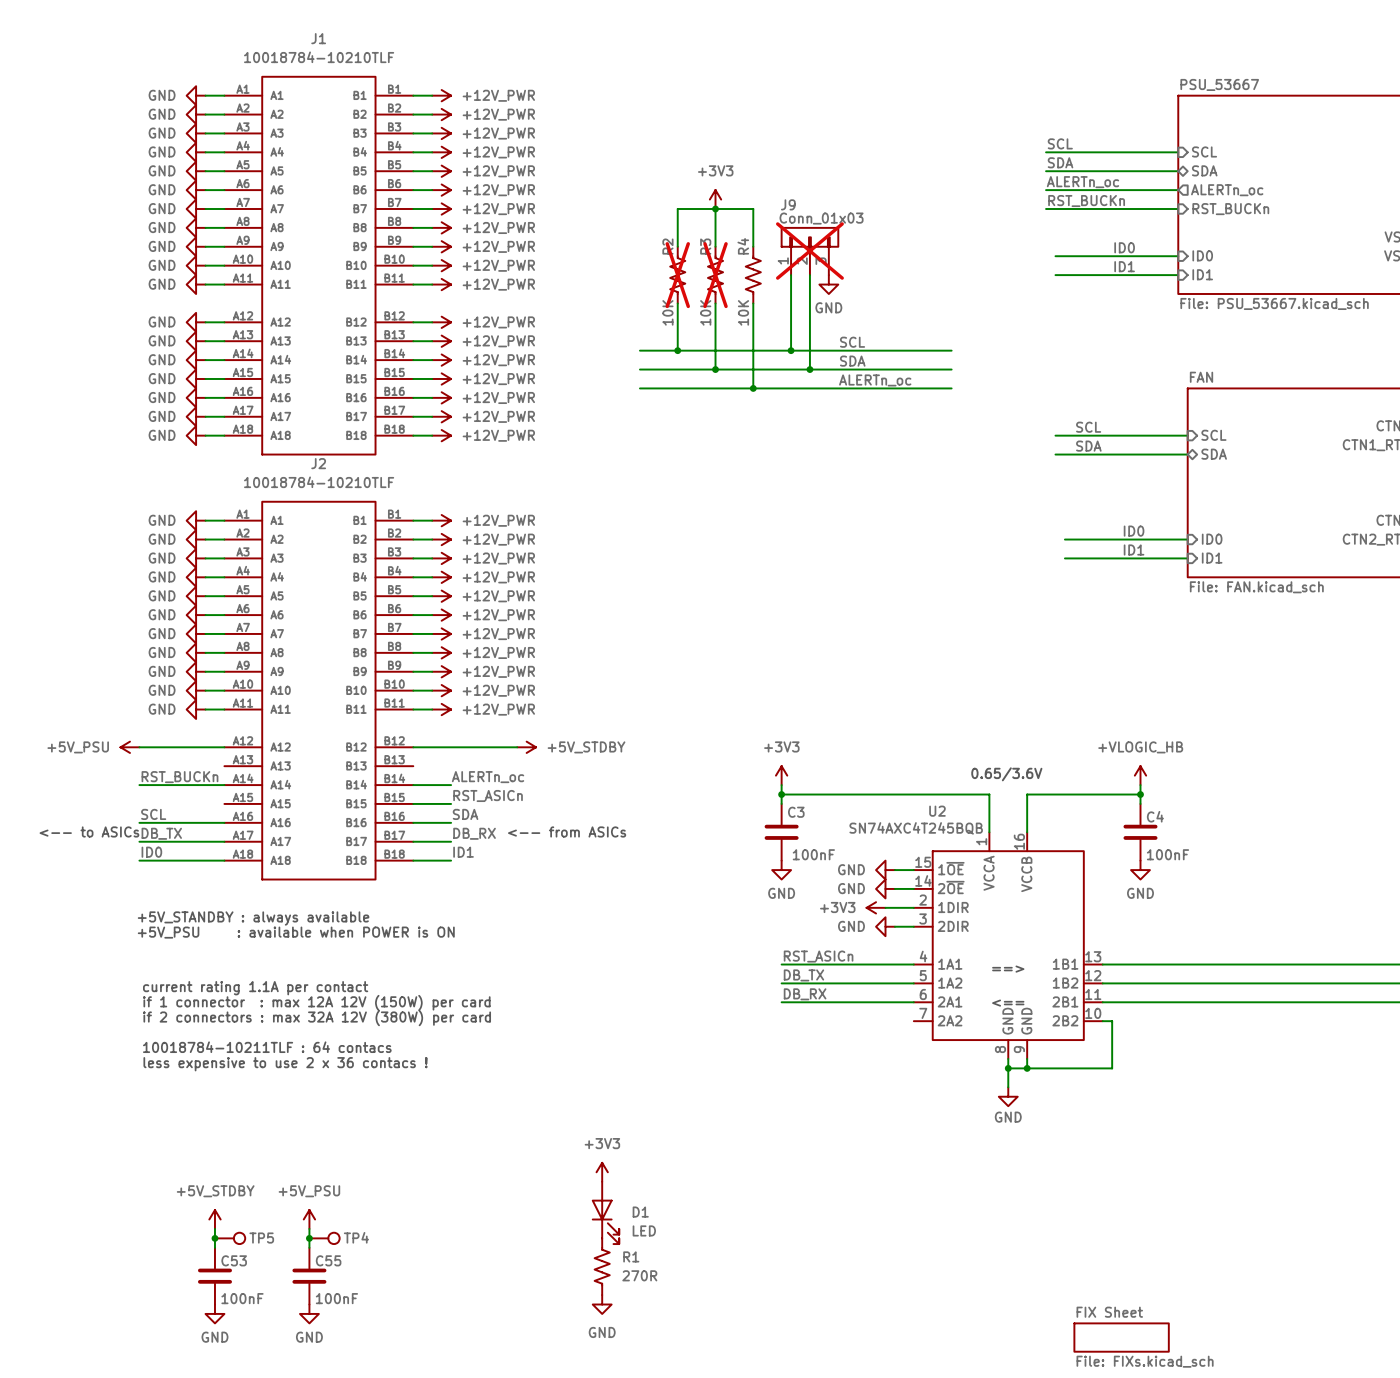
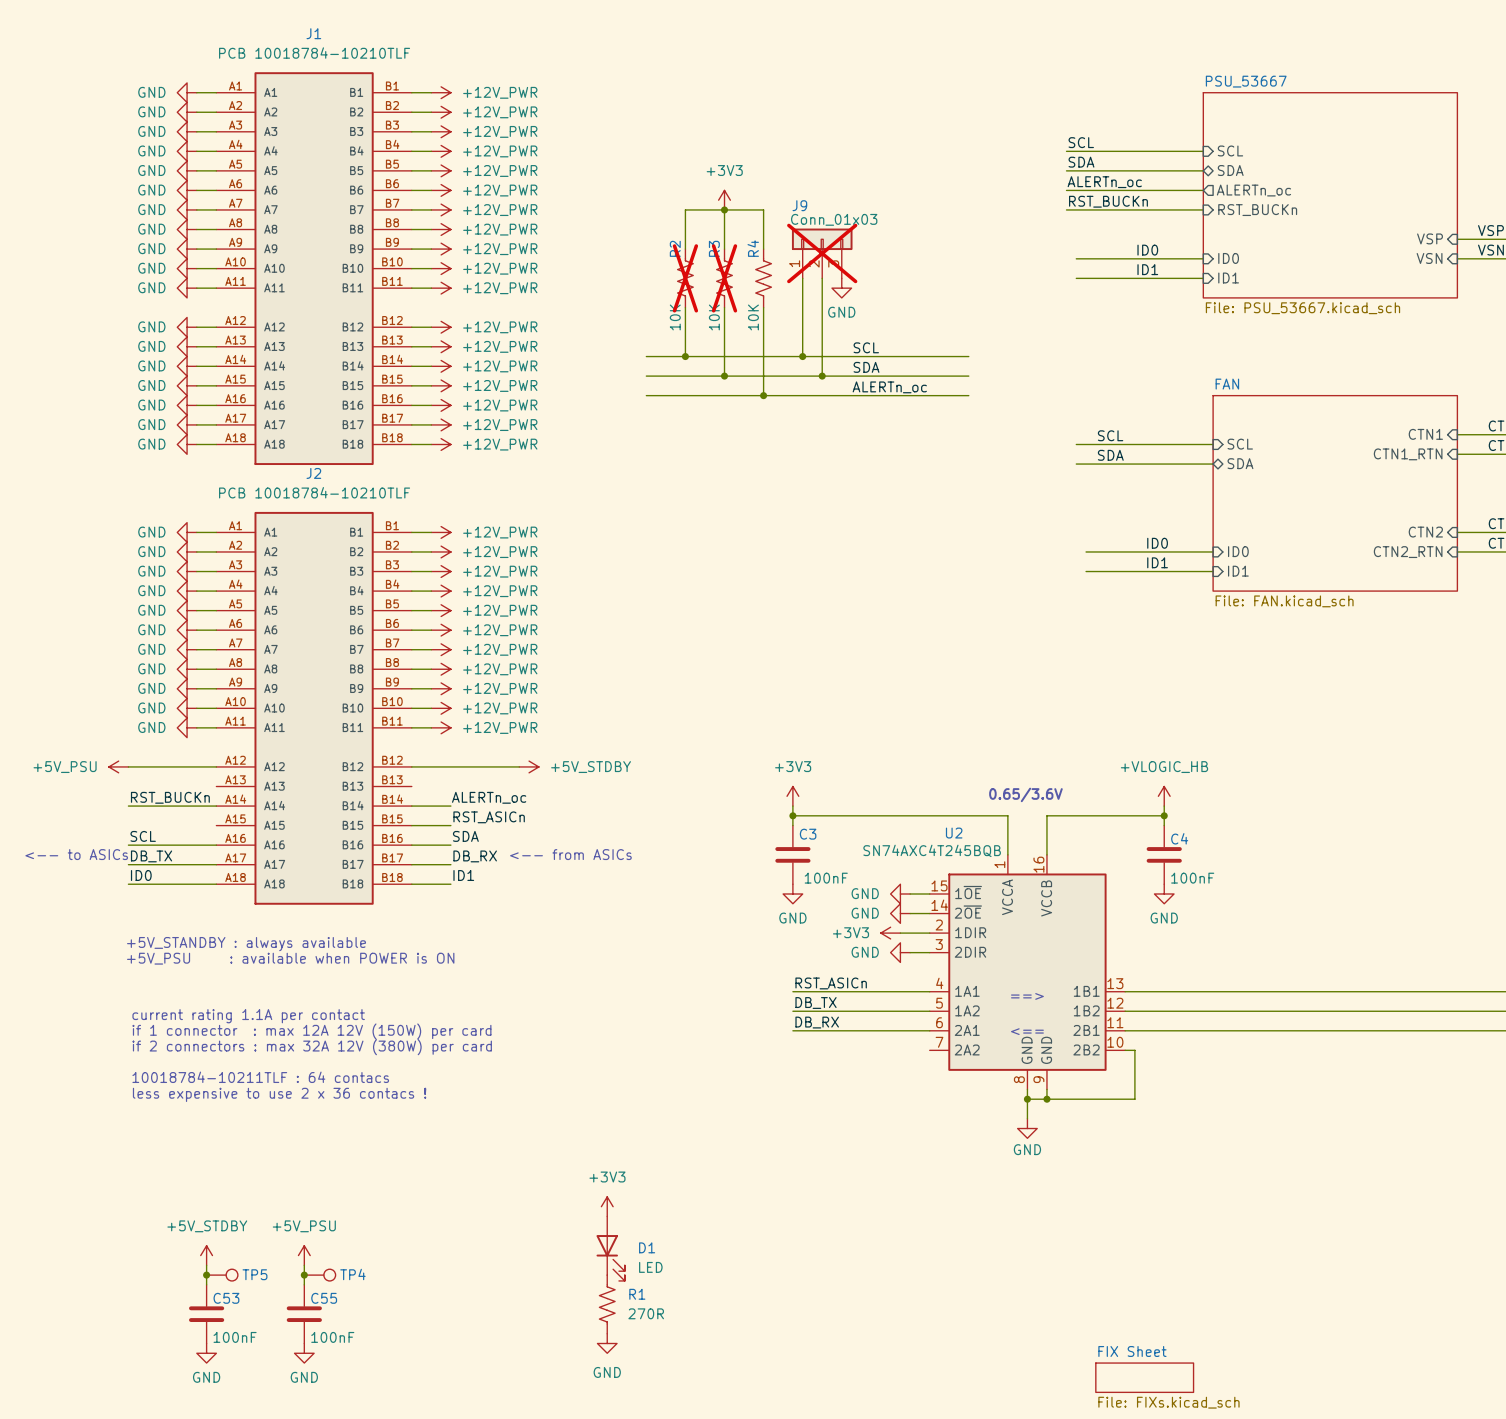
J1 value: 10018784-10210TLF (319, 57) -> PCB 10018784-10210TLF (314, 53)
J2 value: 10018784-10210TLF (319, 482) -> PCB 10018784-10210TLF (314, 492)

